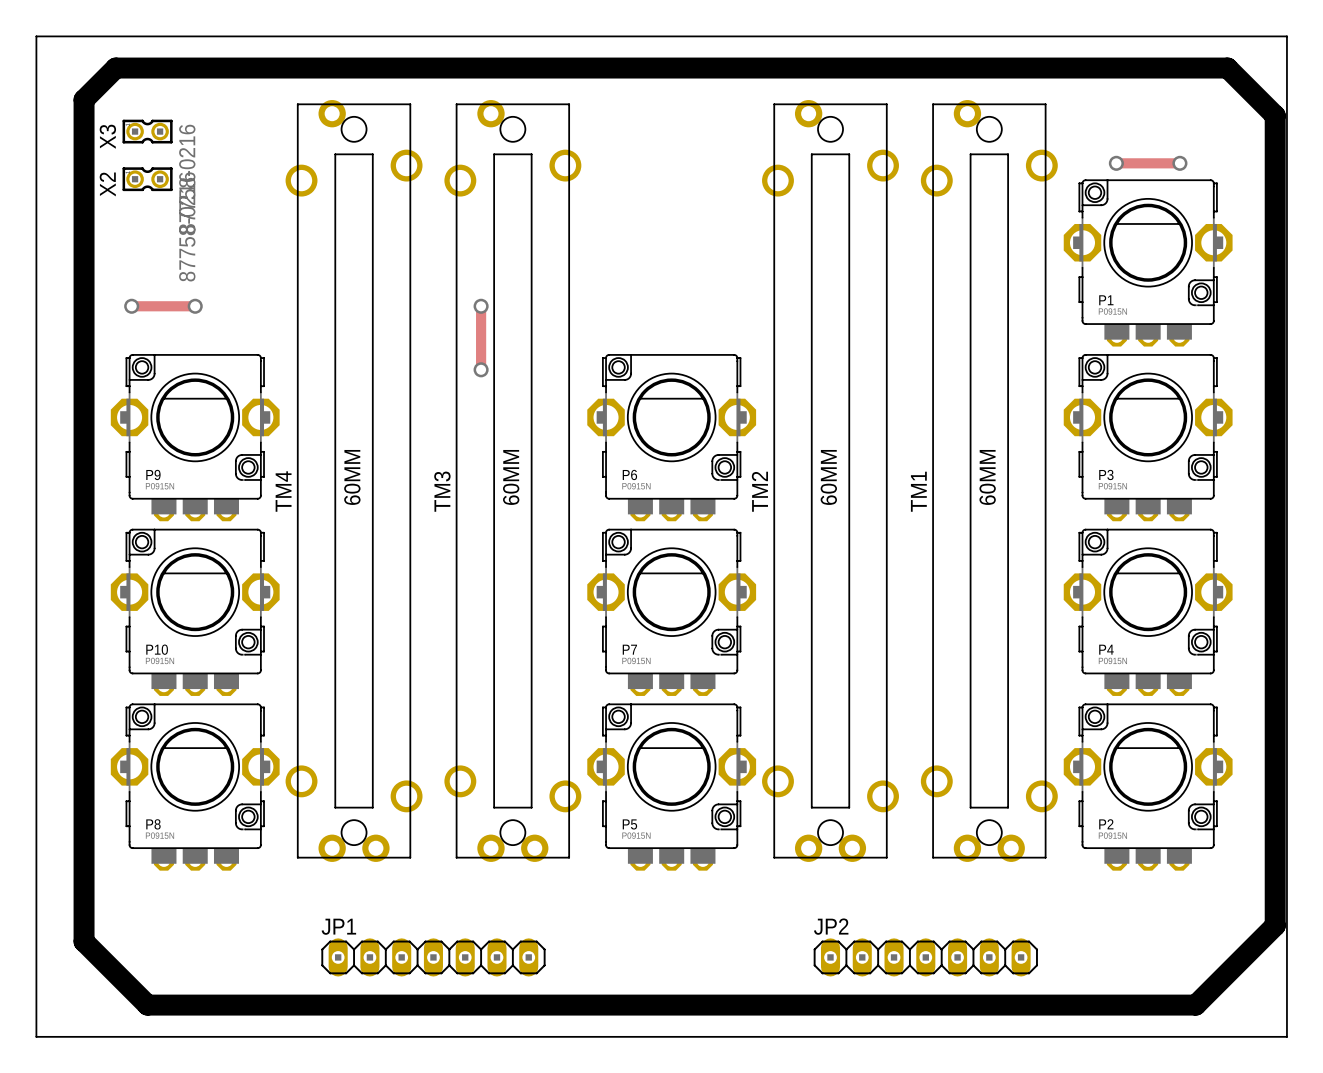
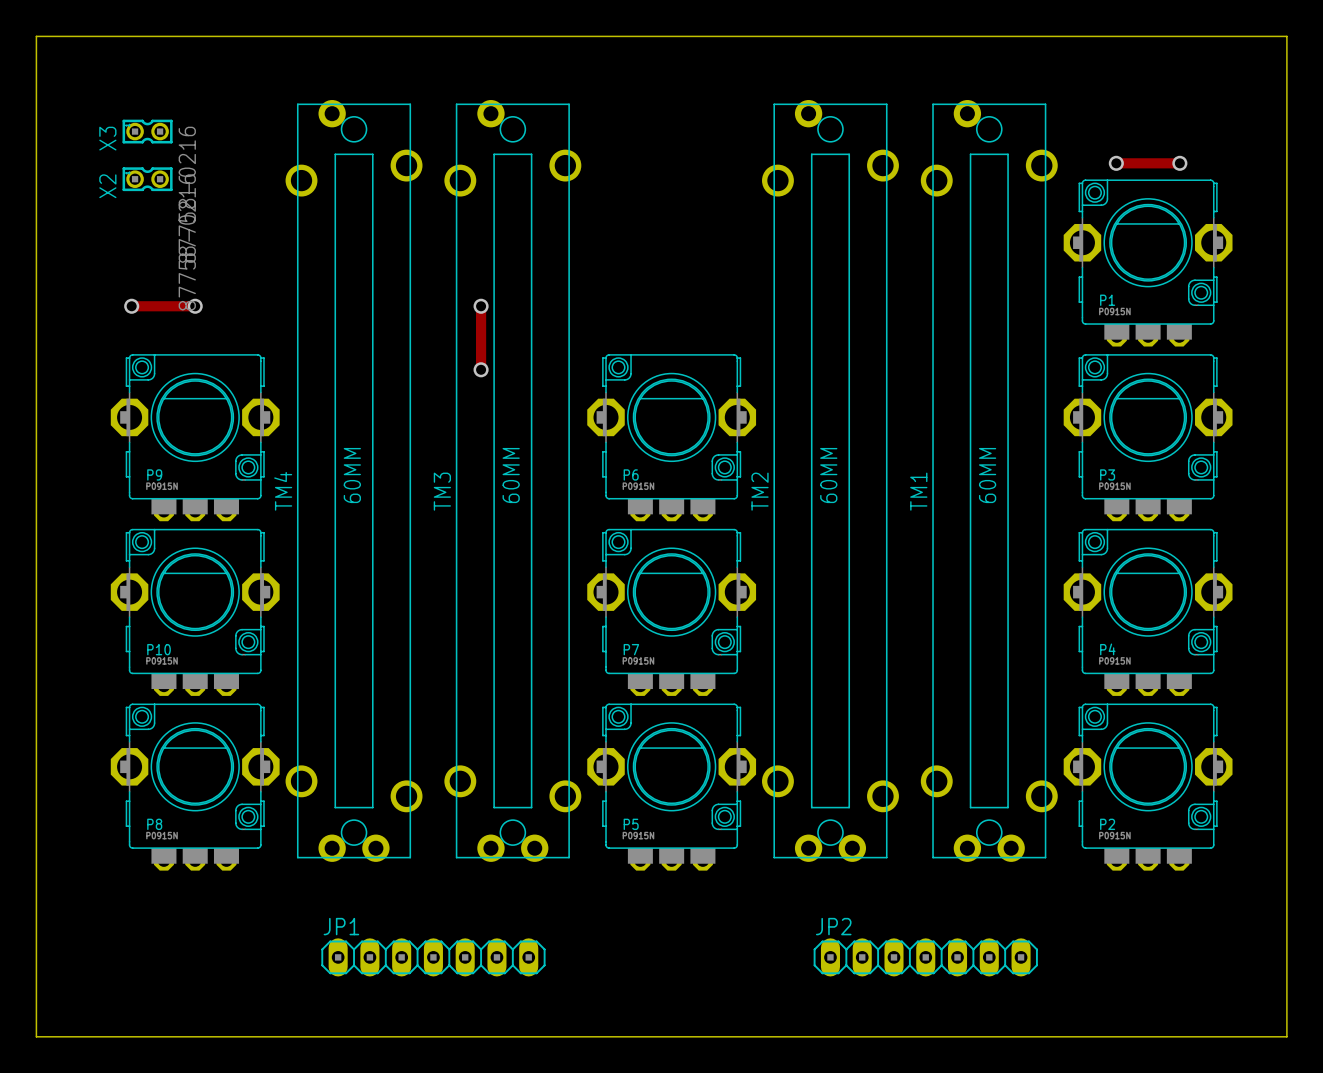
board edge: (115, 68) (1227, 68) (1275, 115) (1275, 925) (1195, 1005) (147, 1005) (84, 941) (84, 99) (115, 68) -> none

